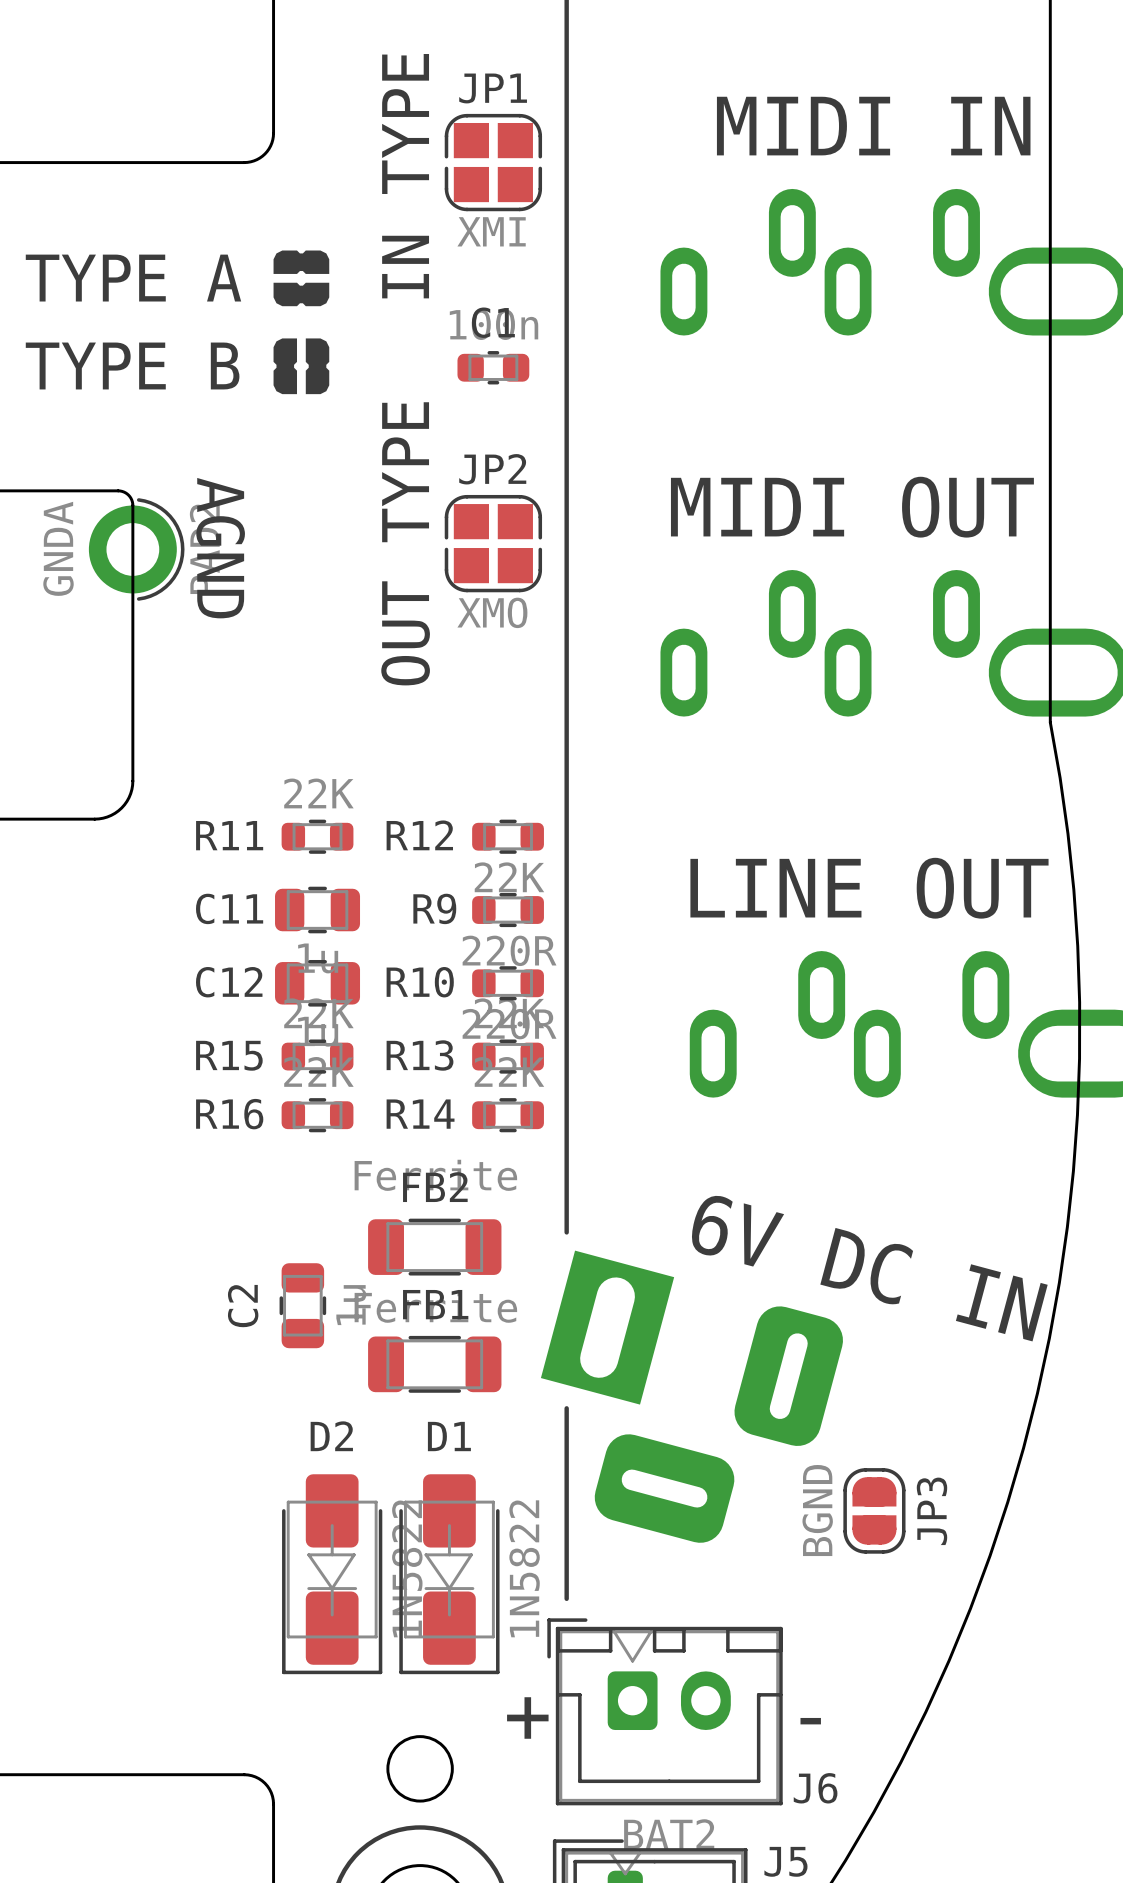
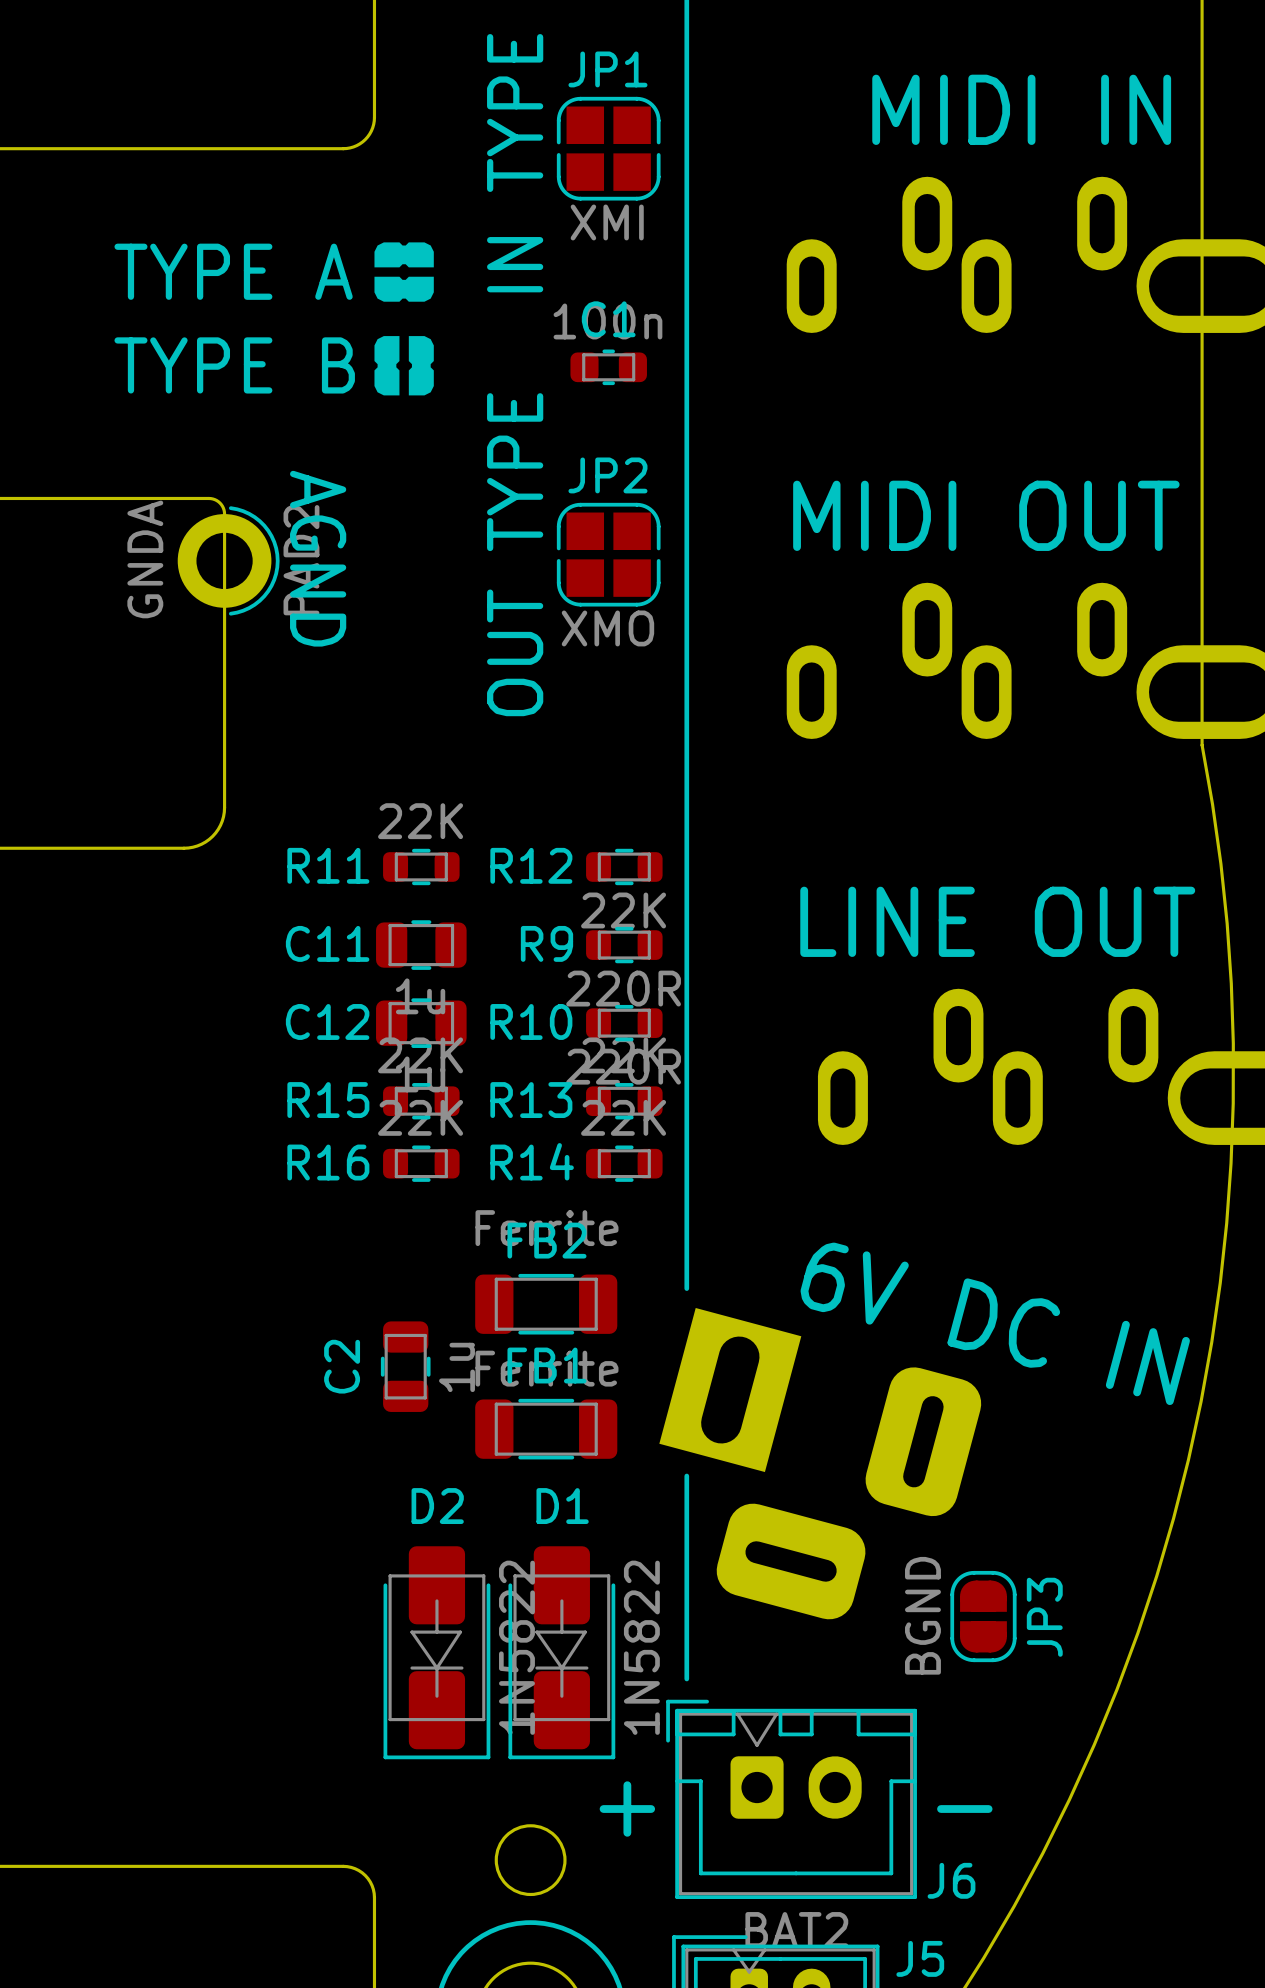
JP3 position: (874, 1510) -> (983, 1616)

